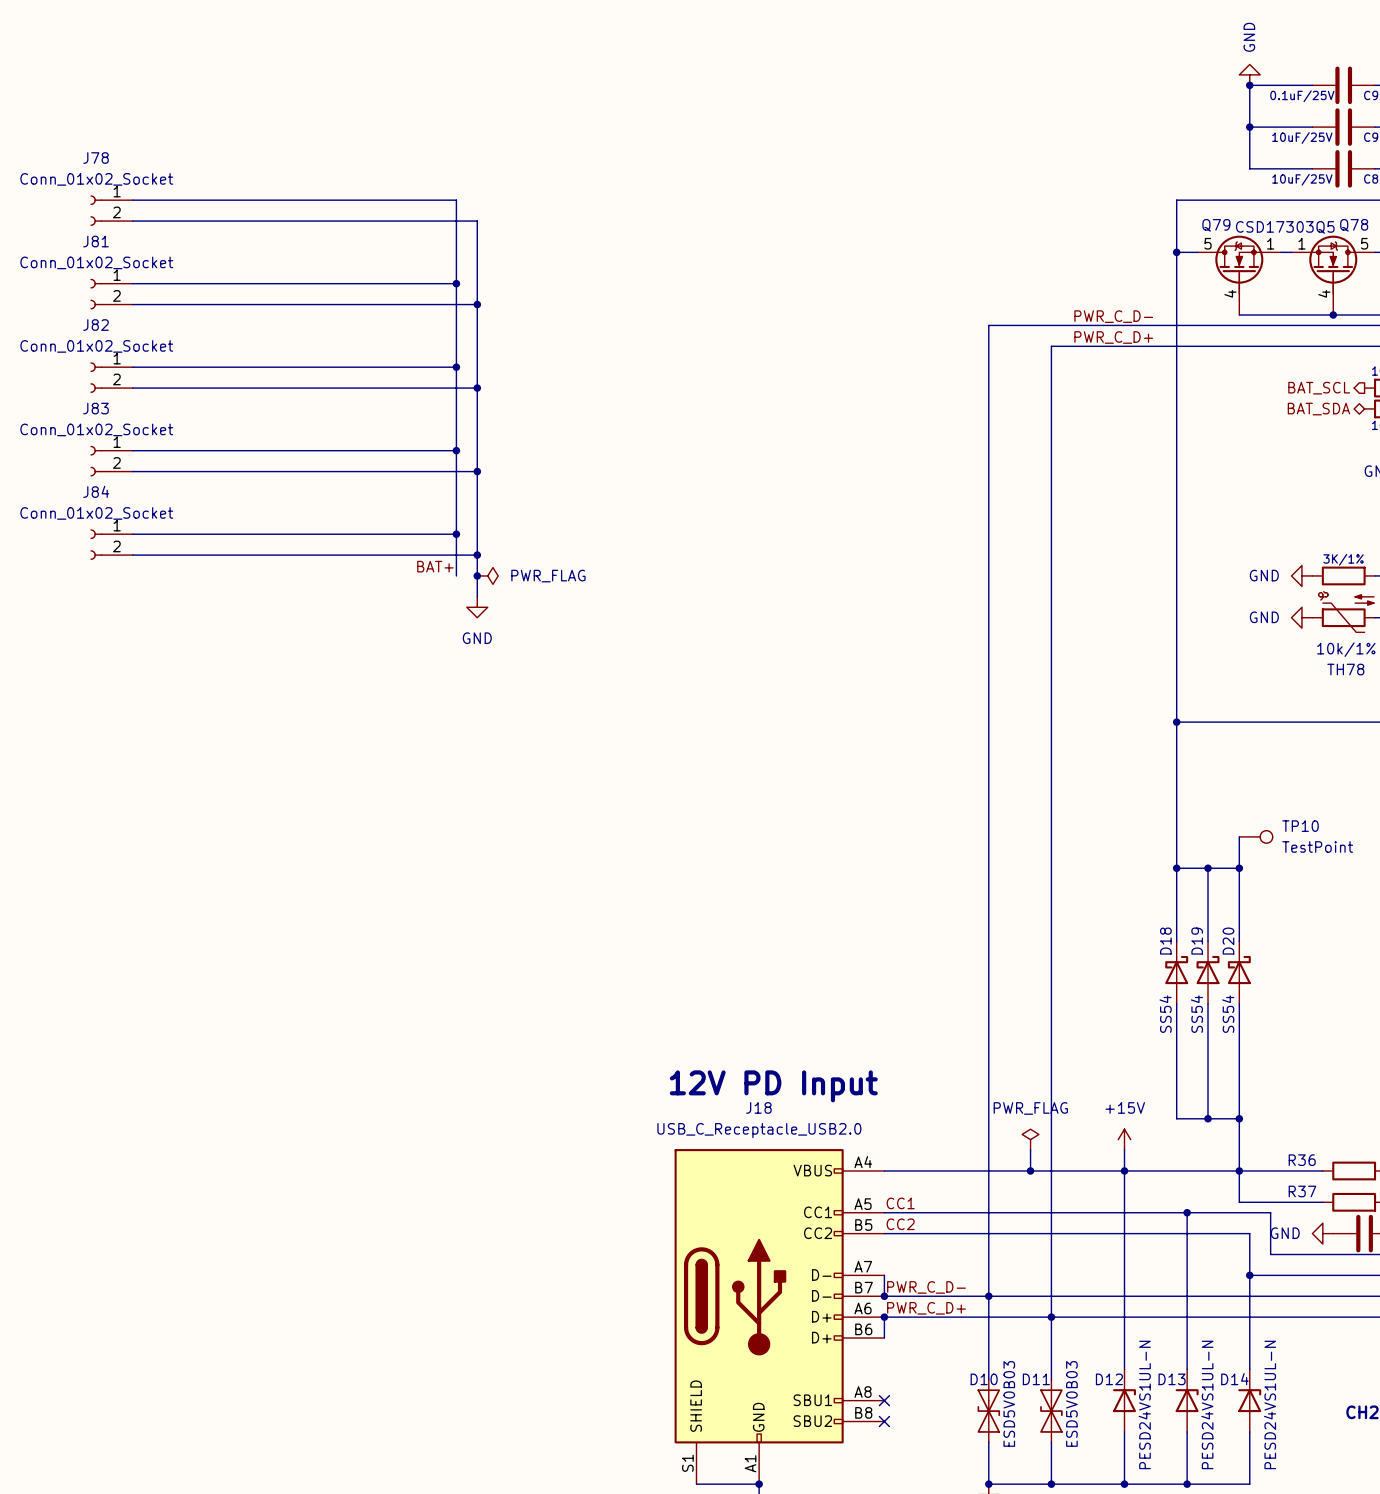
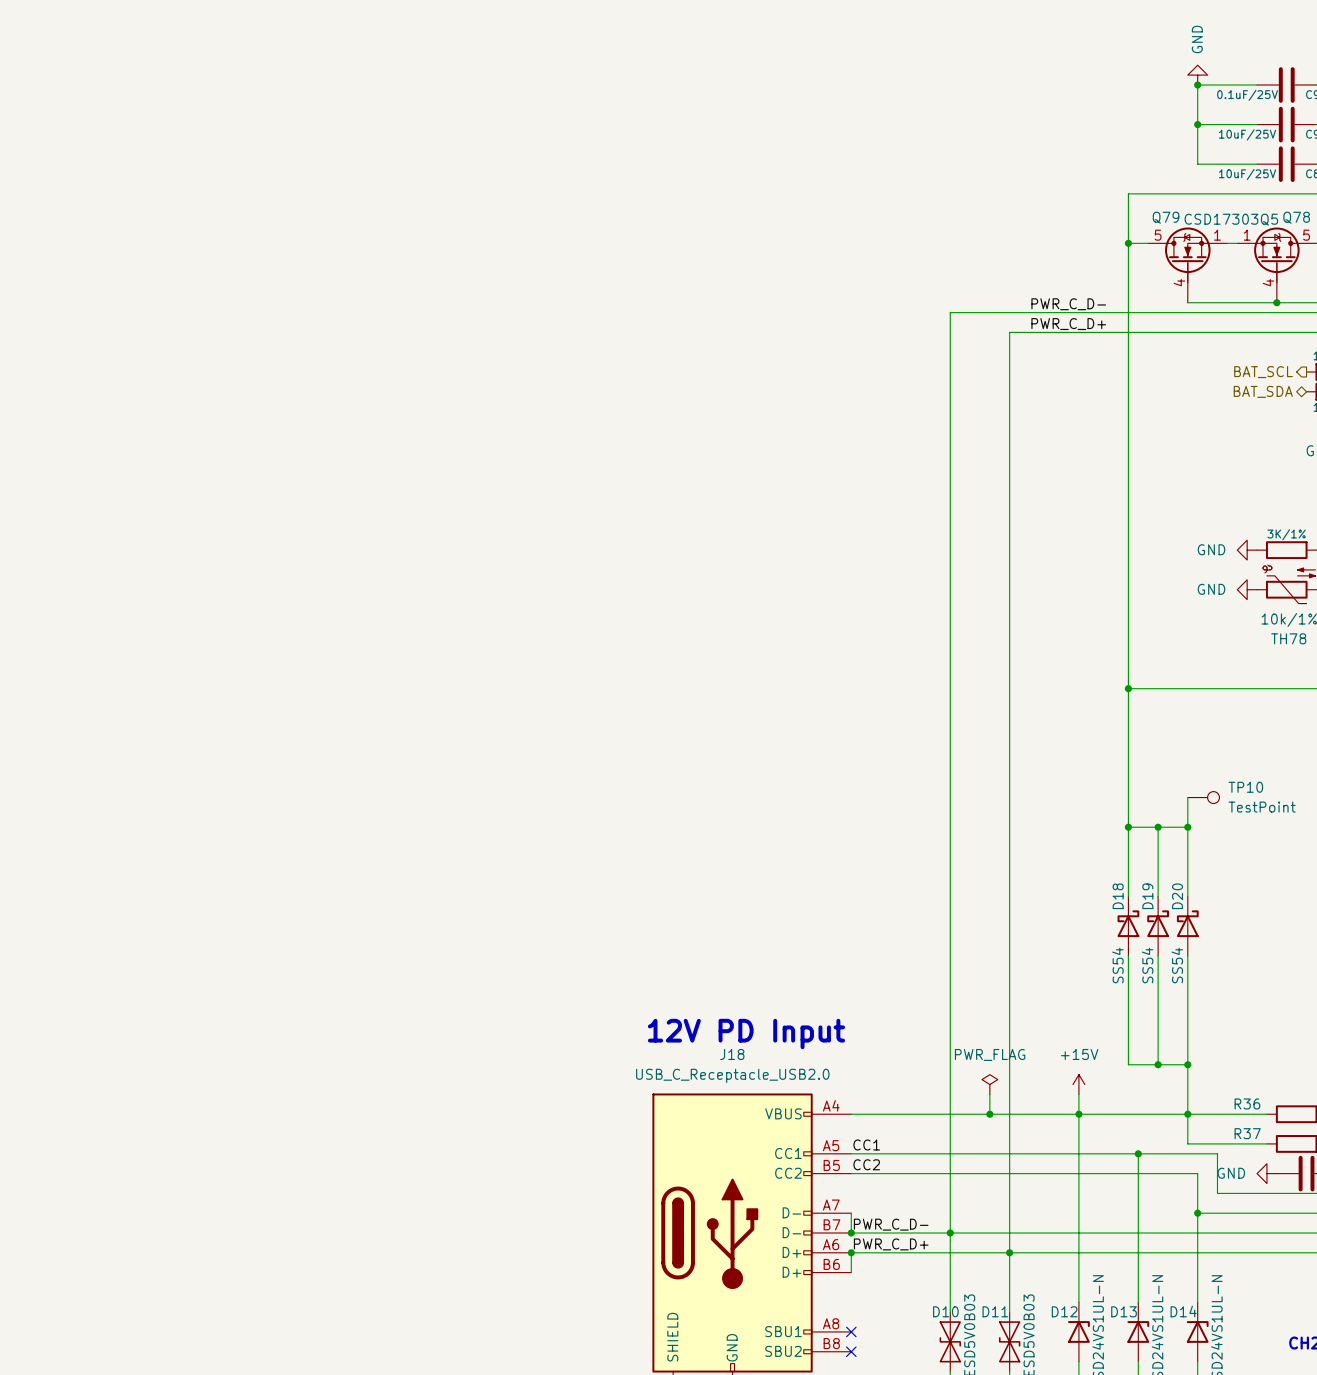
wire: (132, 200) (456, 200) (456, 575) -> none
J78: Conn_01x02_Socket (111, 210) -> none
wire: (132, 221) (477, 221) (477, 596) -> none
wire: (132, 283) (456, 283) -> none
junction: (456, 283) -> none
J81: Conn_01x02_Socket (111, 294) -> none
wire: (132, 304) (477, 304) -> none
junction: (477, 304) -> none
wire: (132, 367) (456, 367) -> none
junction: (456, 367) -> none
J82: Conn_01x02_Socket (111, 377) -> none
wire: (132, 388) (477, 388) -> none
junction: (477, 388) -> none
wire: (132, 450) (456, 450) -> none
junction: (456, 450) -> none
J83: Conn_01x02_Socket (111, 461) -> none
wire: (132, 471) (477, 471) -> none
junction: (477, 471) -> none
wire: (132, 534) (456, 534) -> none
junction: (456, 534) -> none
J84: Conn_01x02_Socket (111, 544) -> none
wire: (132, 555) (477, 555) -> none
junction: (477, 555) -> none
label: BAT+ (435, 566) -> none
junction: (477, 575) -> none
power symbol: PWR_FLAG (487, 575) -> none
power symbol: GND (477, 607) -> none

